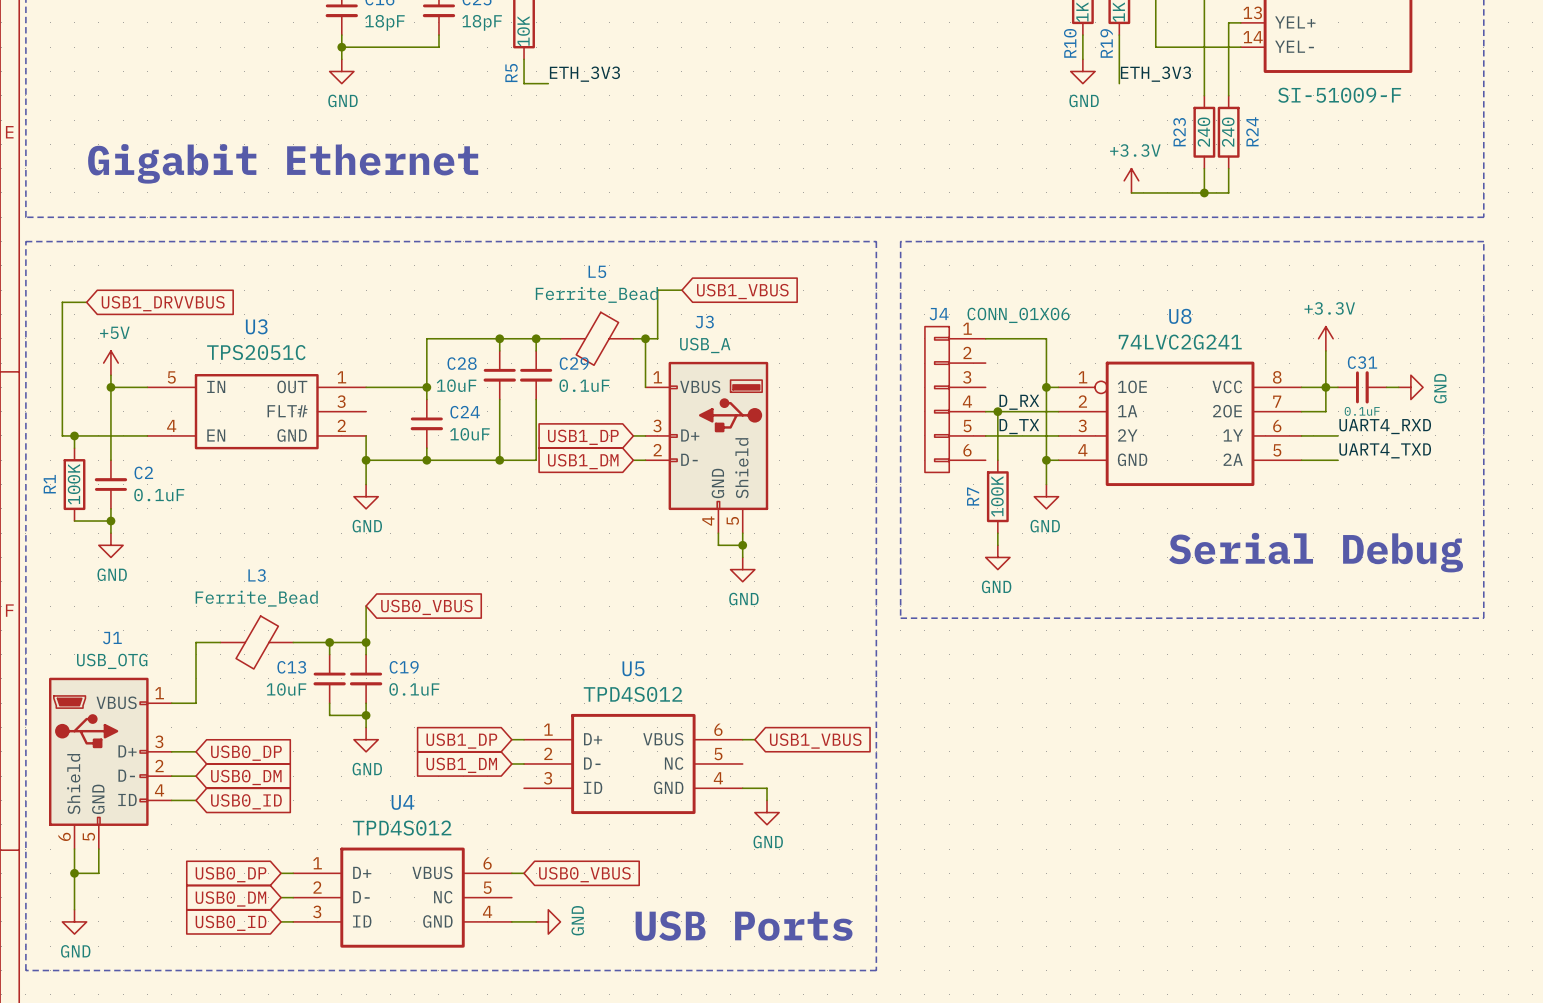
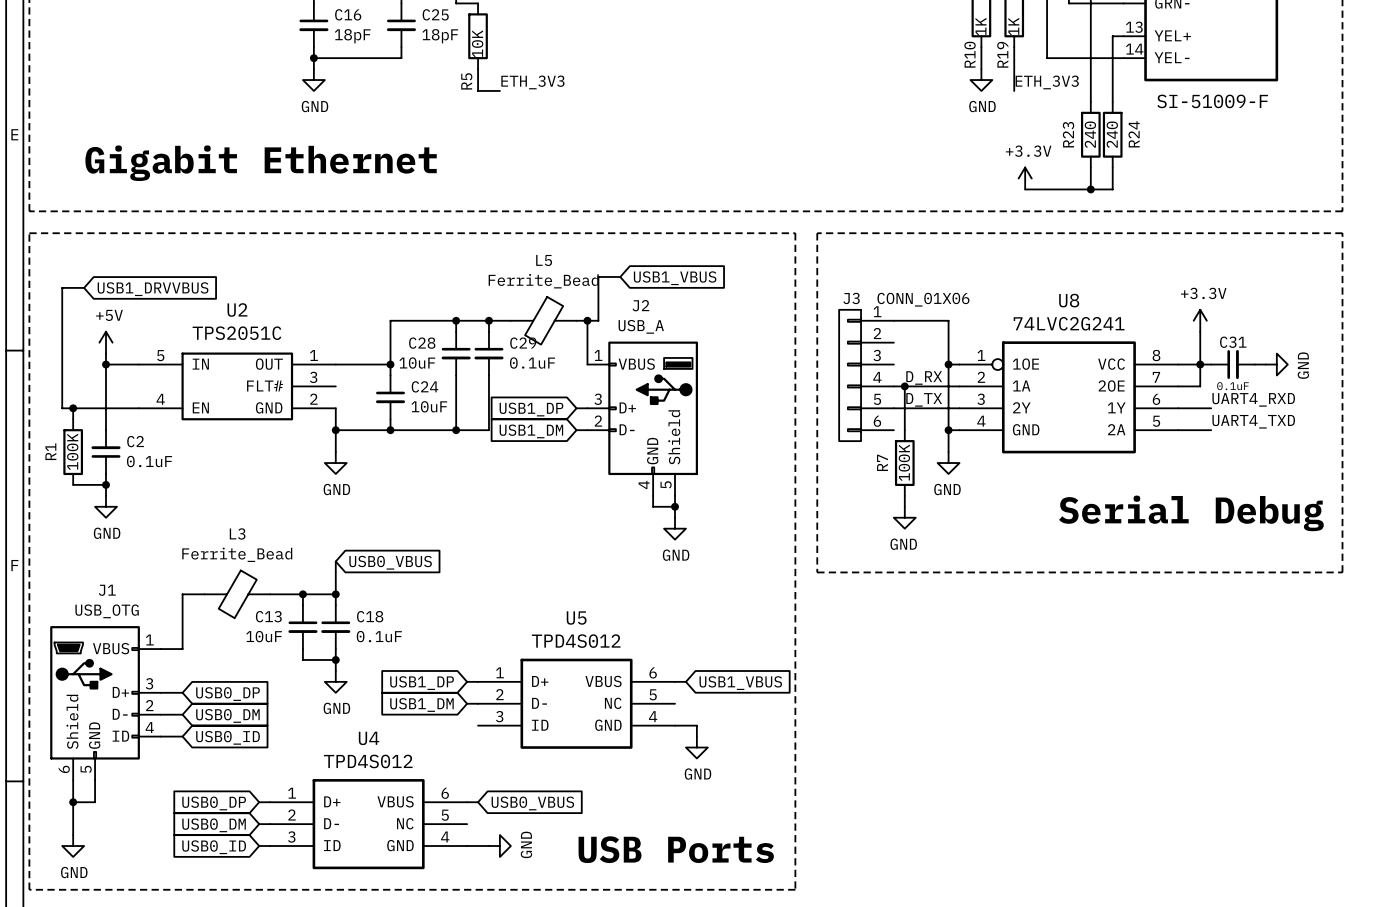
J4 name: J4 (939, 314) -> J3 (851, 298)
J3 name: J3 (704, 322) -> J2 (640, 305)
U3 name: U3 (256, 326) -> U2 (237, 309)
C19 name: C19 (404, 667) -> C18 (370, 616)

